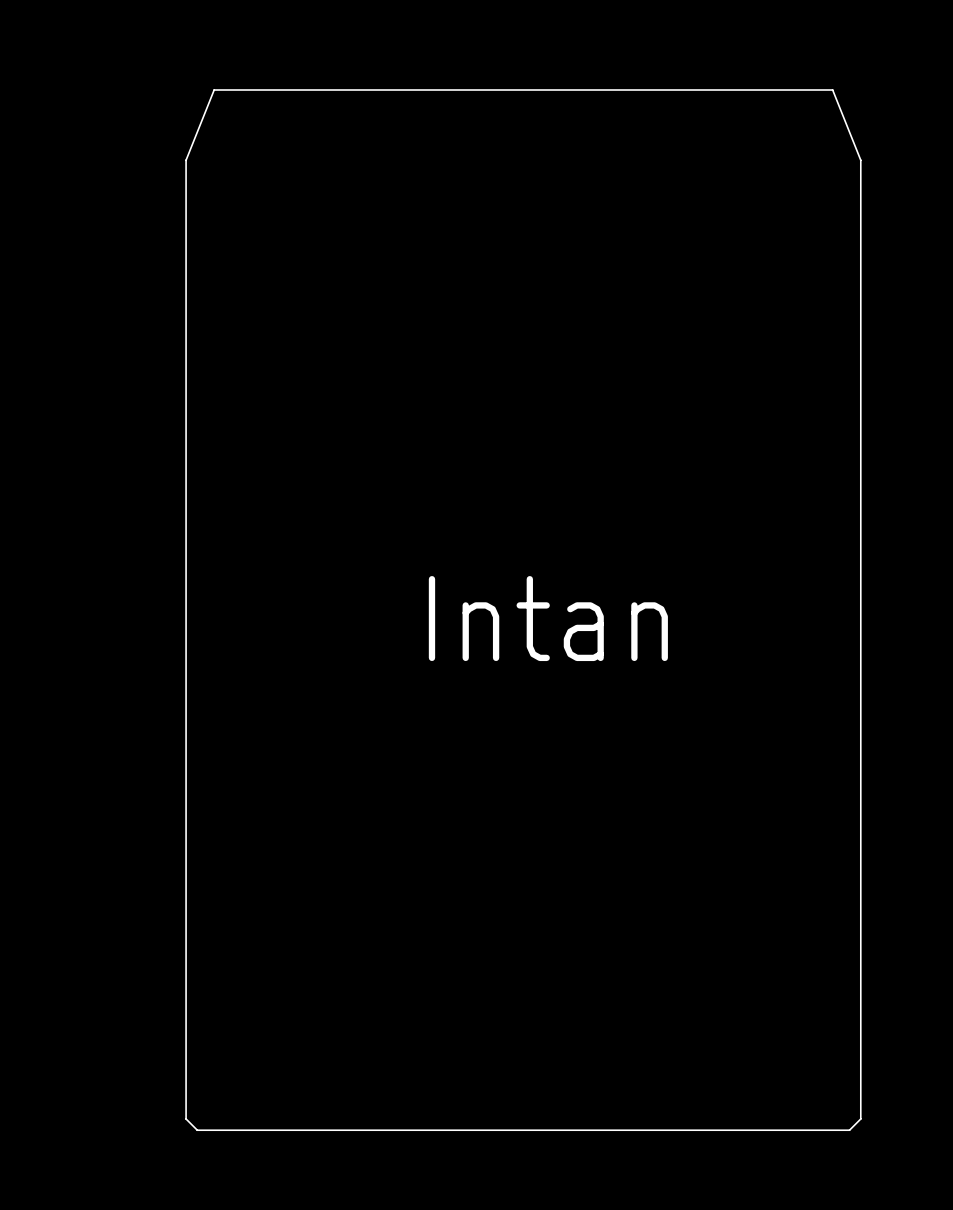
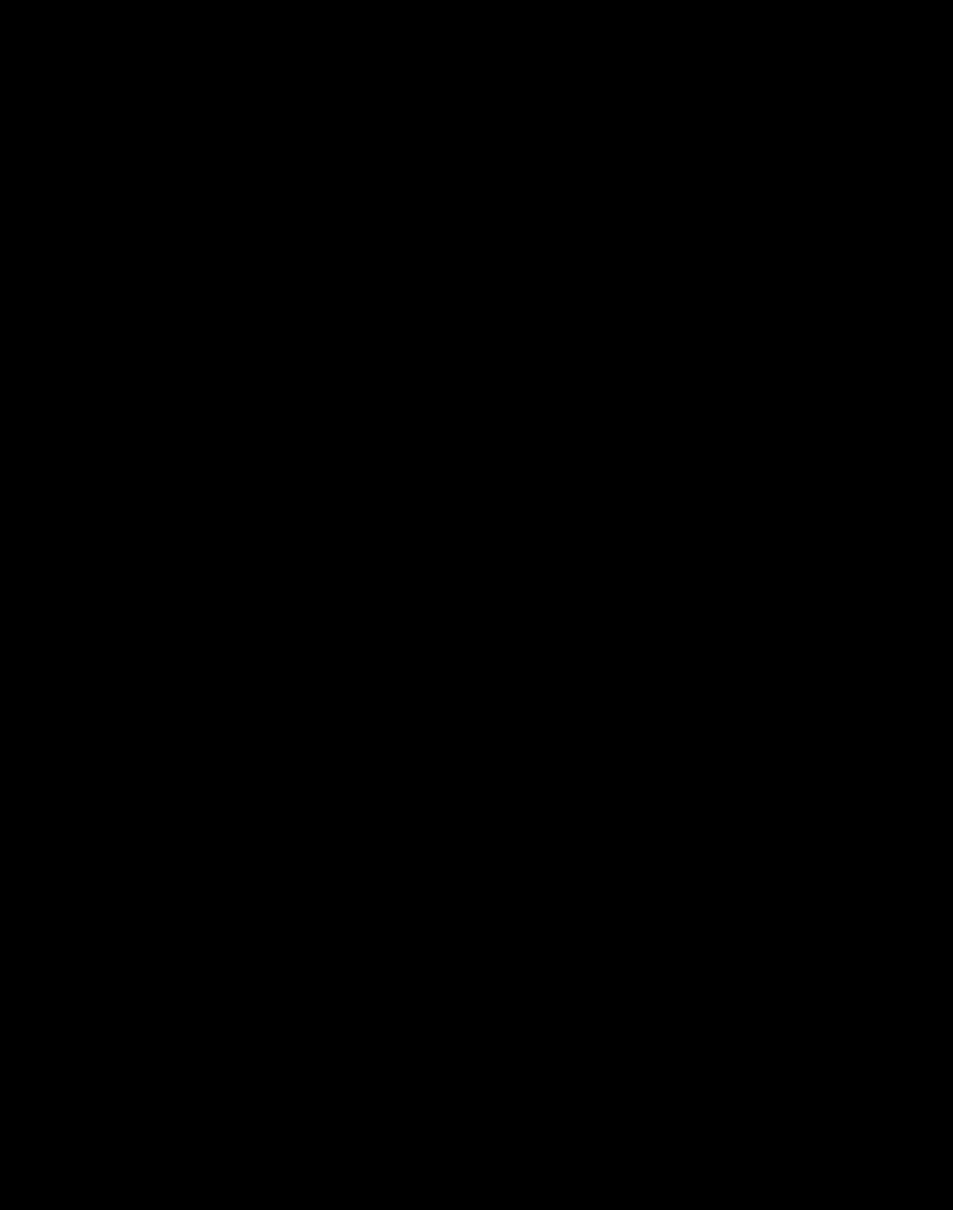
board edge: (214, 90) (832, 90) (860, 160) (860, 1118) (849, 1130) (197, 1130) (186, 1118) (186, 160) (214, 90) -> none
text: Intan (548, 618) -> none

